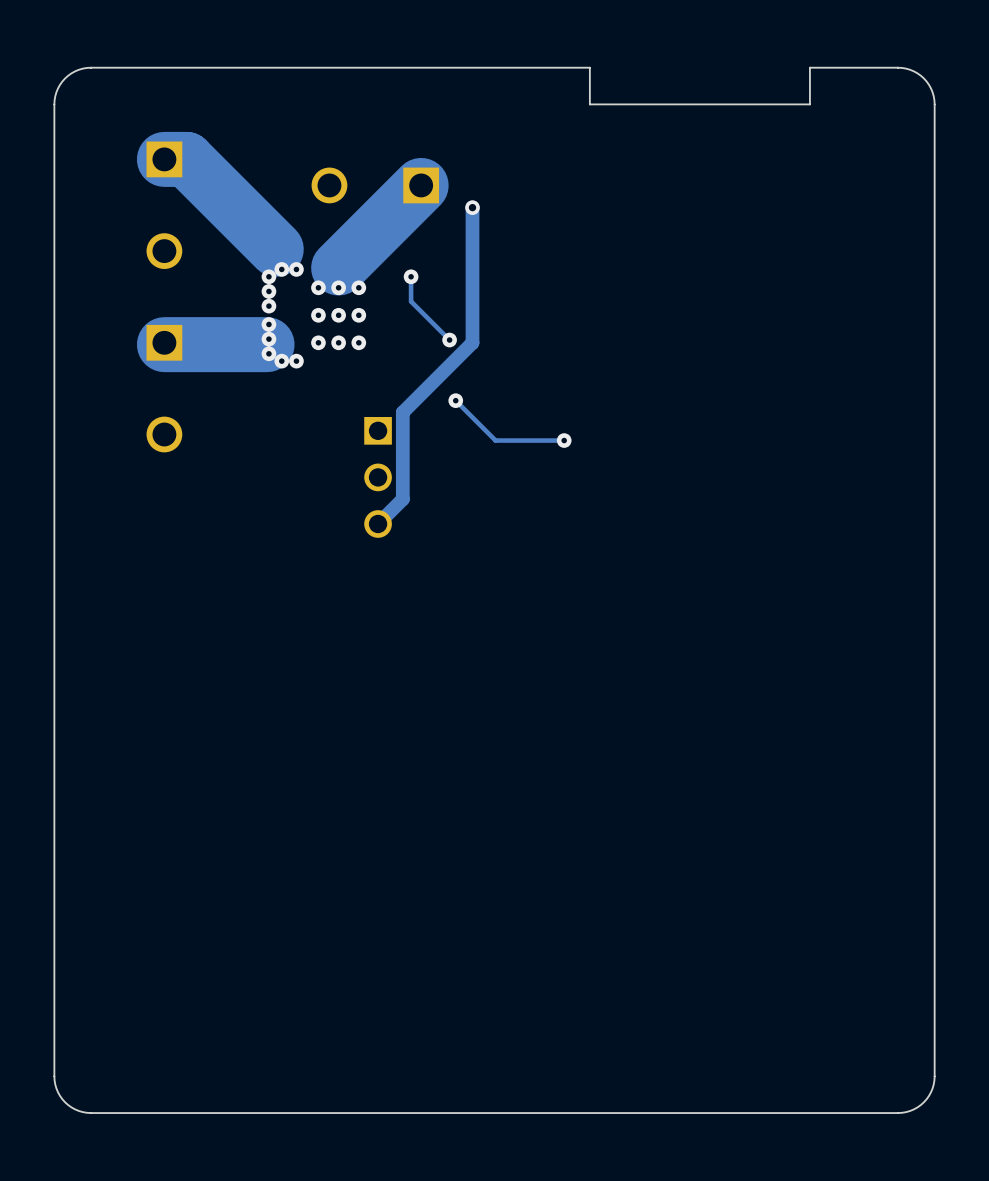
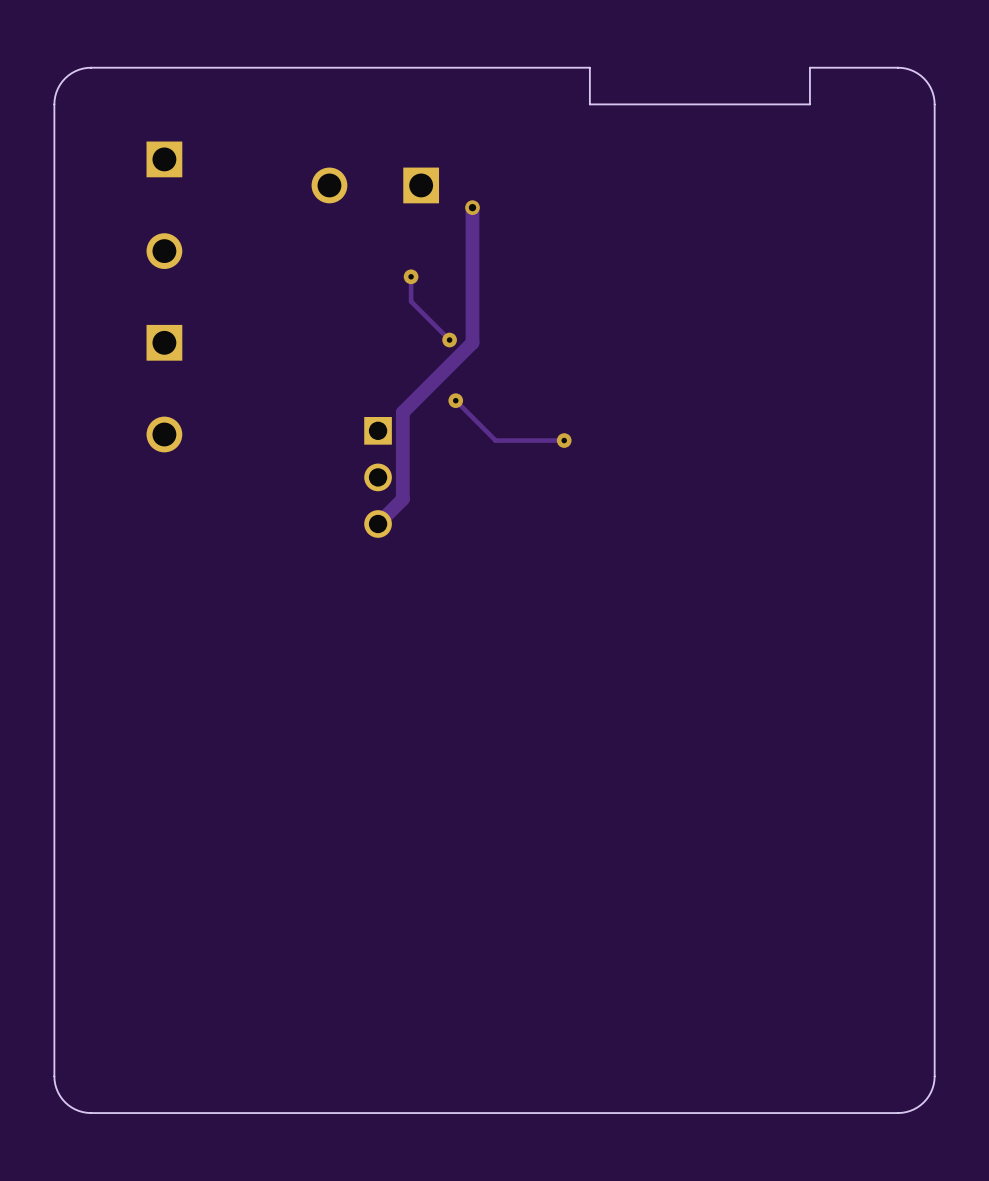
track: (164, 159) (186, 159) (276, 249) -> none
track: (421, 185) (338, 267) -> none
via: (281, 269) -> none
via: (296, 269) -> none
via: (268, 276) -> none
via: (318, 287) -> none
via: (338, 287) -> none
via: (358, 287) -> none
via: (268, 291) -> none
via: (268, 306) -> none
via: (318, 315) -> none
via: (338, 315) -> none
via: (358, 315) -> none
via: (268, 324) -> none
via: (268, 339) -> none
via: (318, 342) -> none
via: (338, 342) -> none
via: (358, 342) -> none
track: (267, 344) (164, 344) -> none
via: (268, 353) -> none
via: (281, 361) -> none
via: (296, 361) -> none

